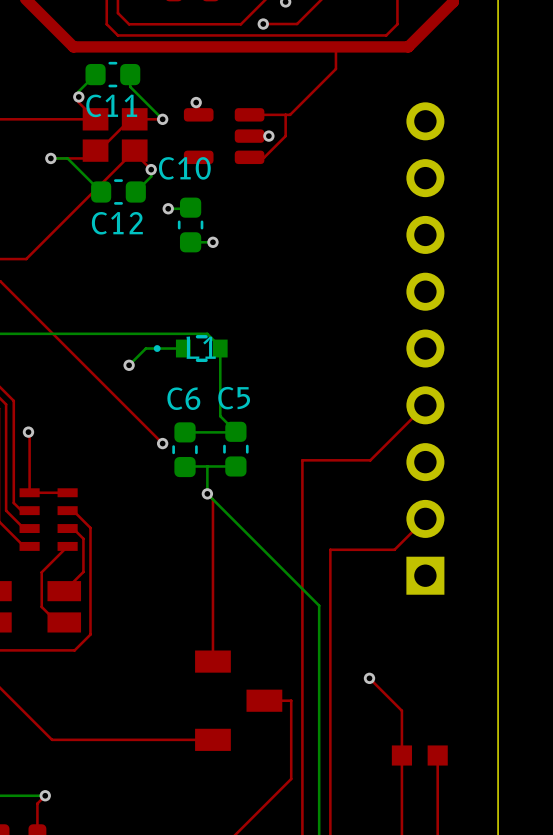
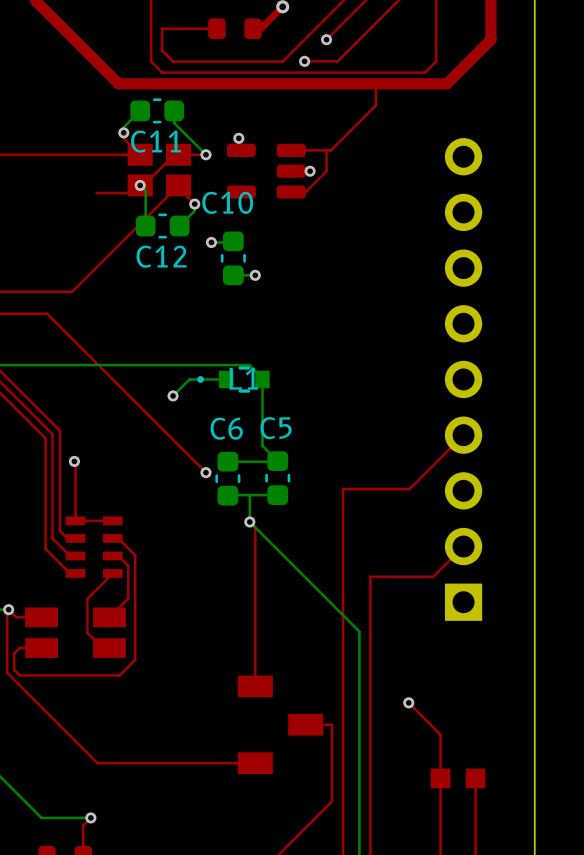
bottom track: (50, 158) (67, 158) (101, 191) -> (140, 185) (145, 190) (145, 226)
via position: (50, 158) -> (140, 185)

